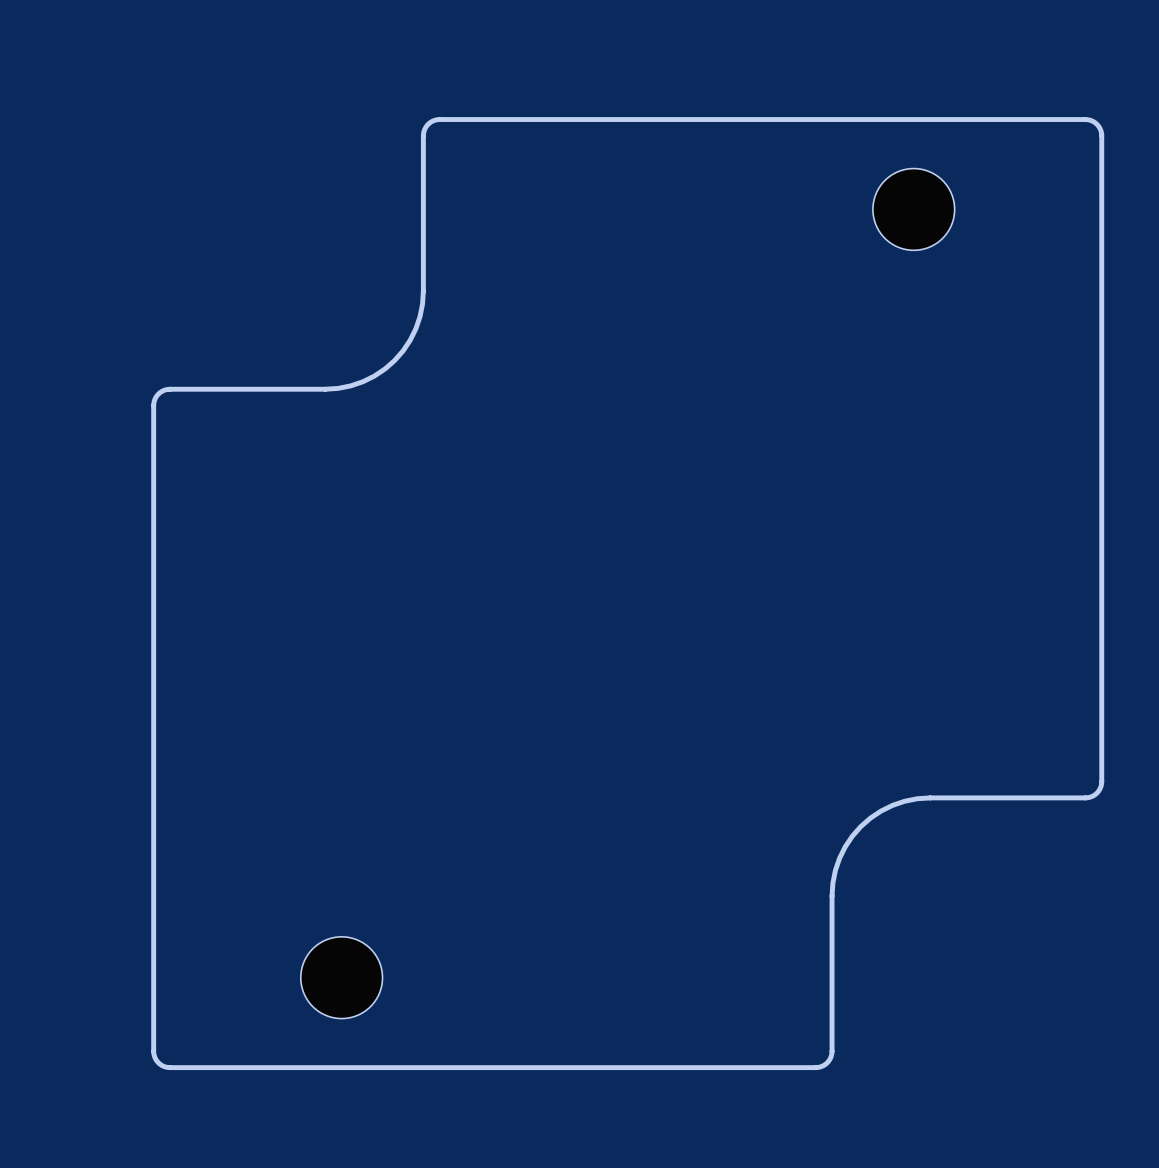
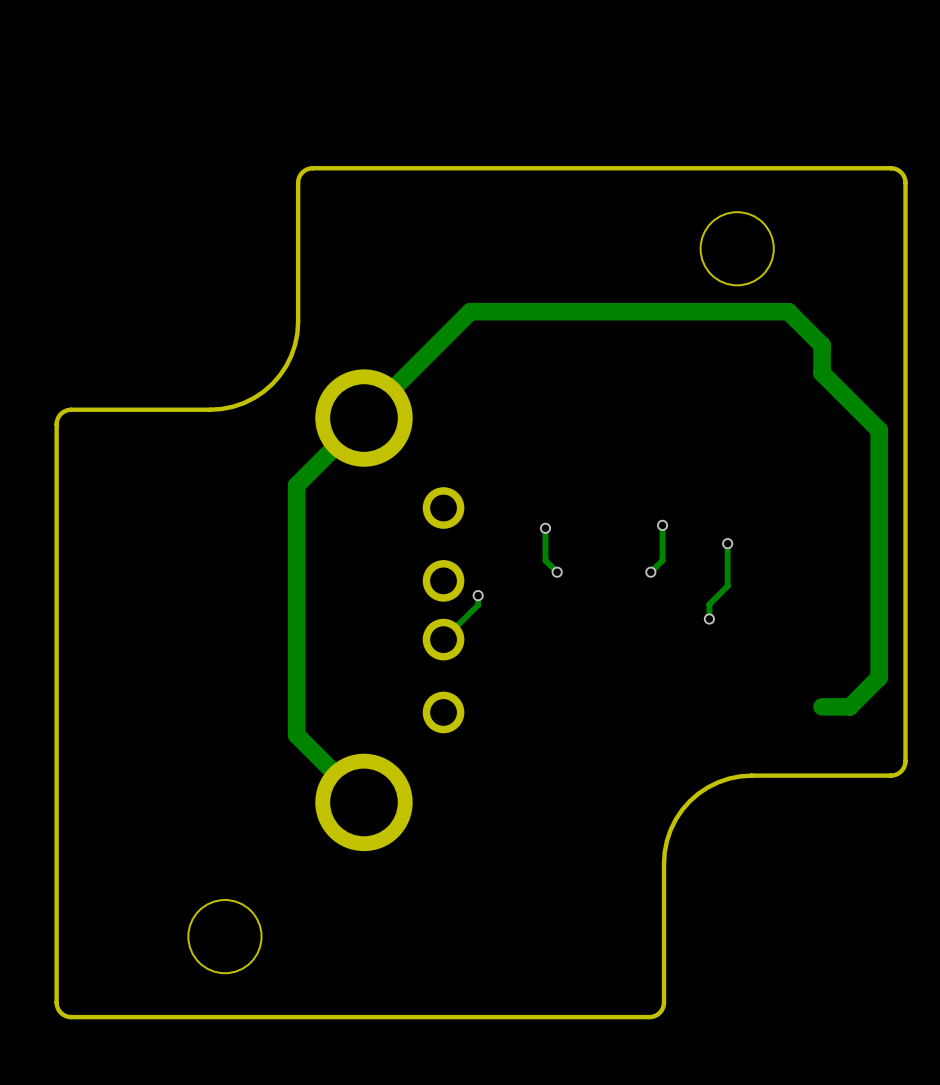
track: none -> (662, 525) (662, 560) (650, 572)
via: none -> (662, 525)
track: none -> (545, 528) (545, 560) (557, 572)
via: none -> (545, 528)
track: none -> (727, 543) (727, 586) (709, 604) (709, 619)
via: none -> (727, 543)
via: none -> (557, 572)
via: none -> (650, 572)
track: none -> (478, 595) (478, 605) (443, 639)
via: none -> (478, 595)
part: none -> (389, 610)
via: none -> (709, 619)
track: none -> (822, 706) (849, 706) (879, 677) (879, 430) (822, 373) (822, 345) (788, 311) (470, 311) (296, 485) (296, 735) (363, 802)

